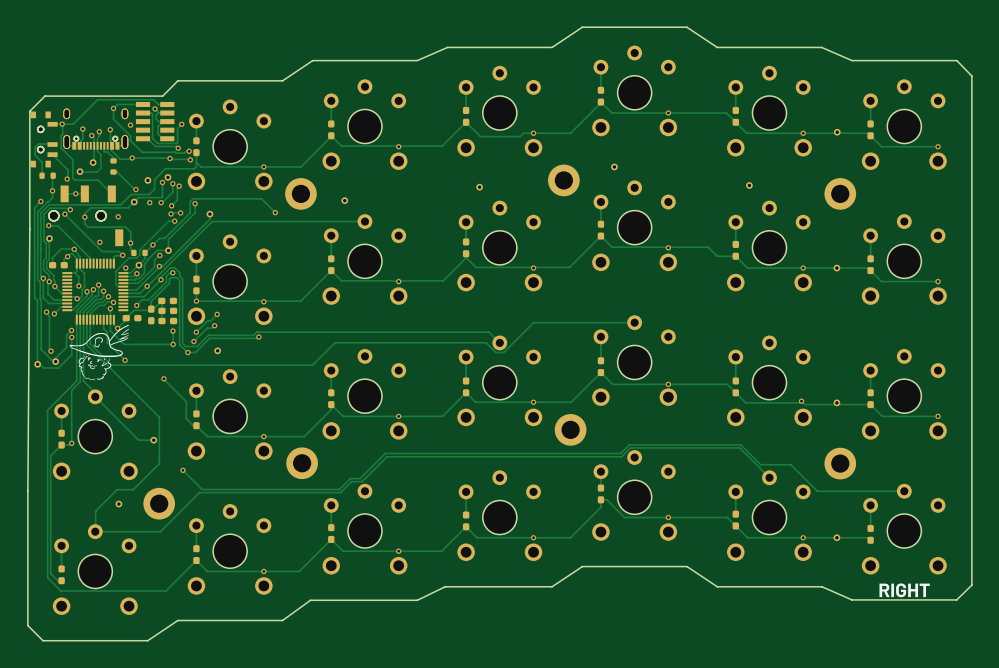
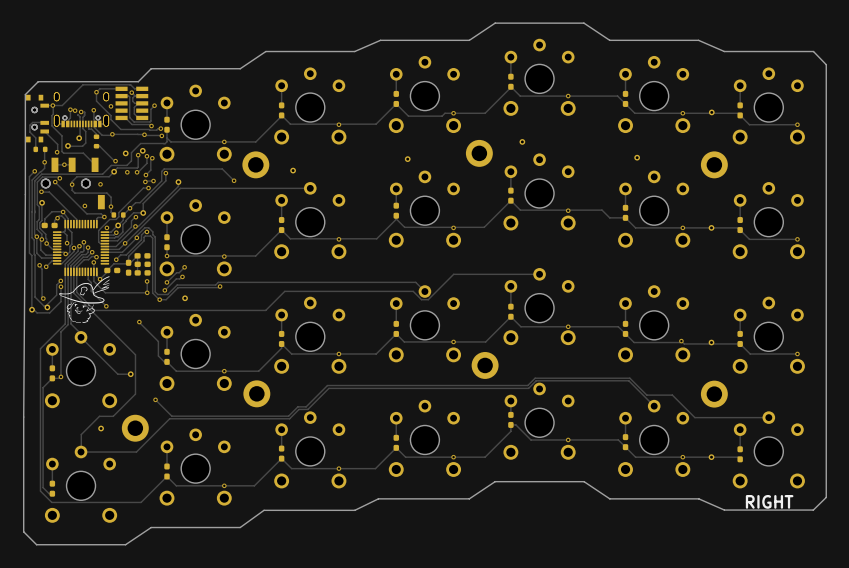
via: none -> (75, 110)
via: none -> (81, 111)
via: (99, 131) -> none
via: (91, 135) -> none

